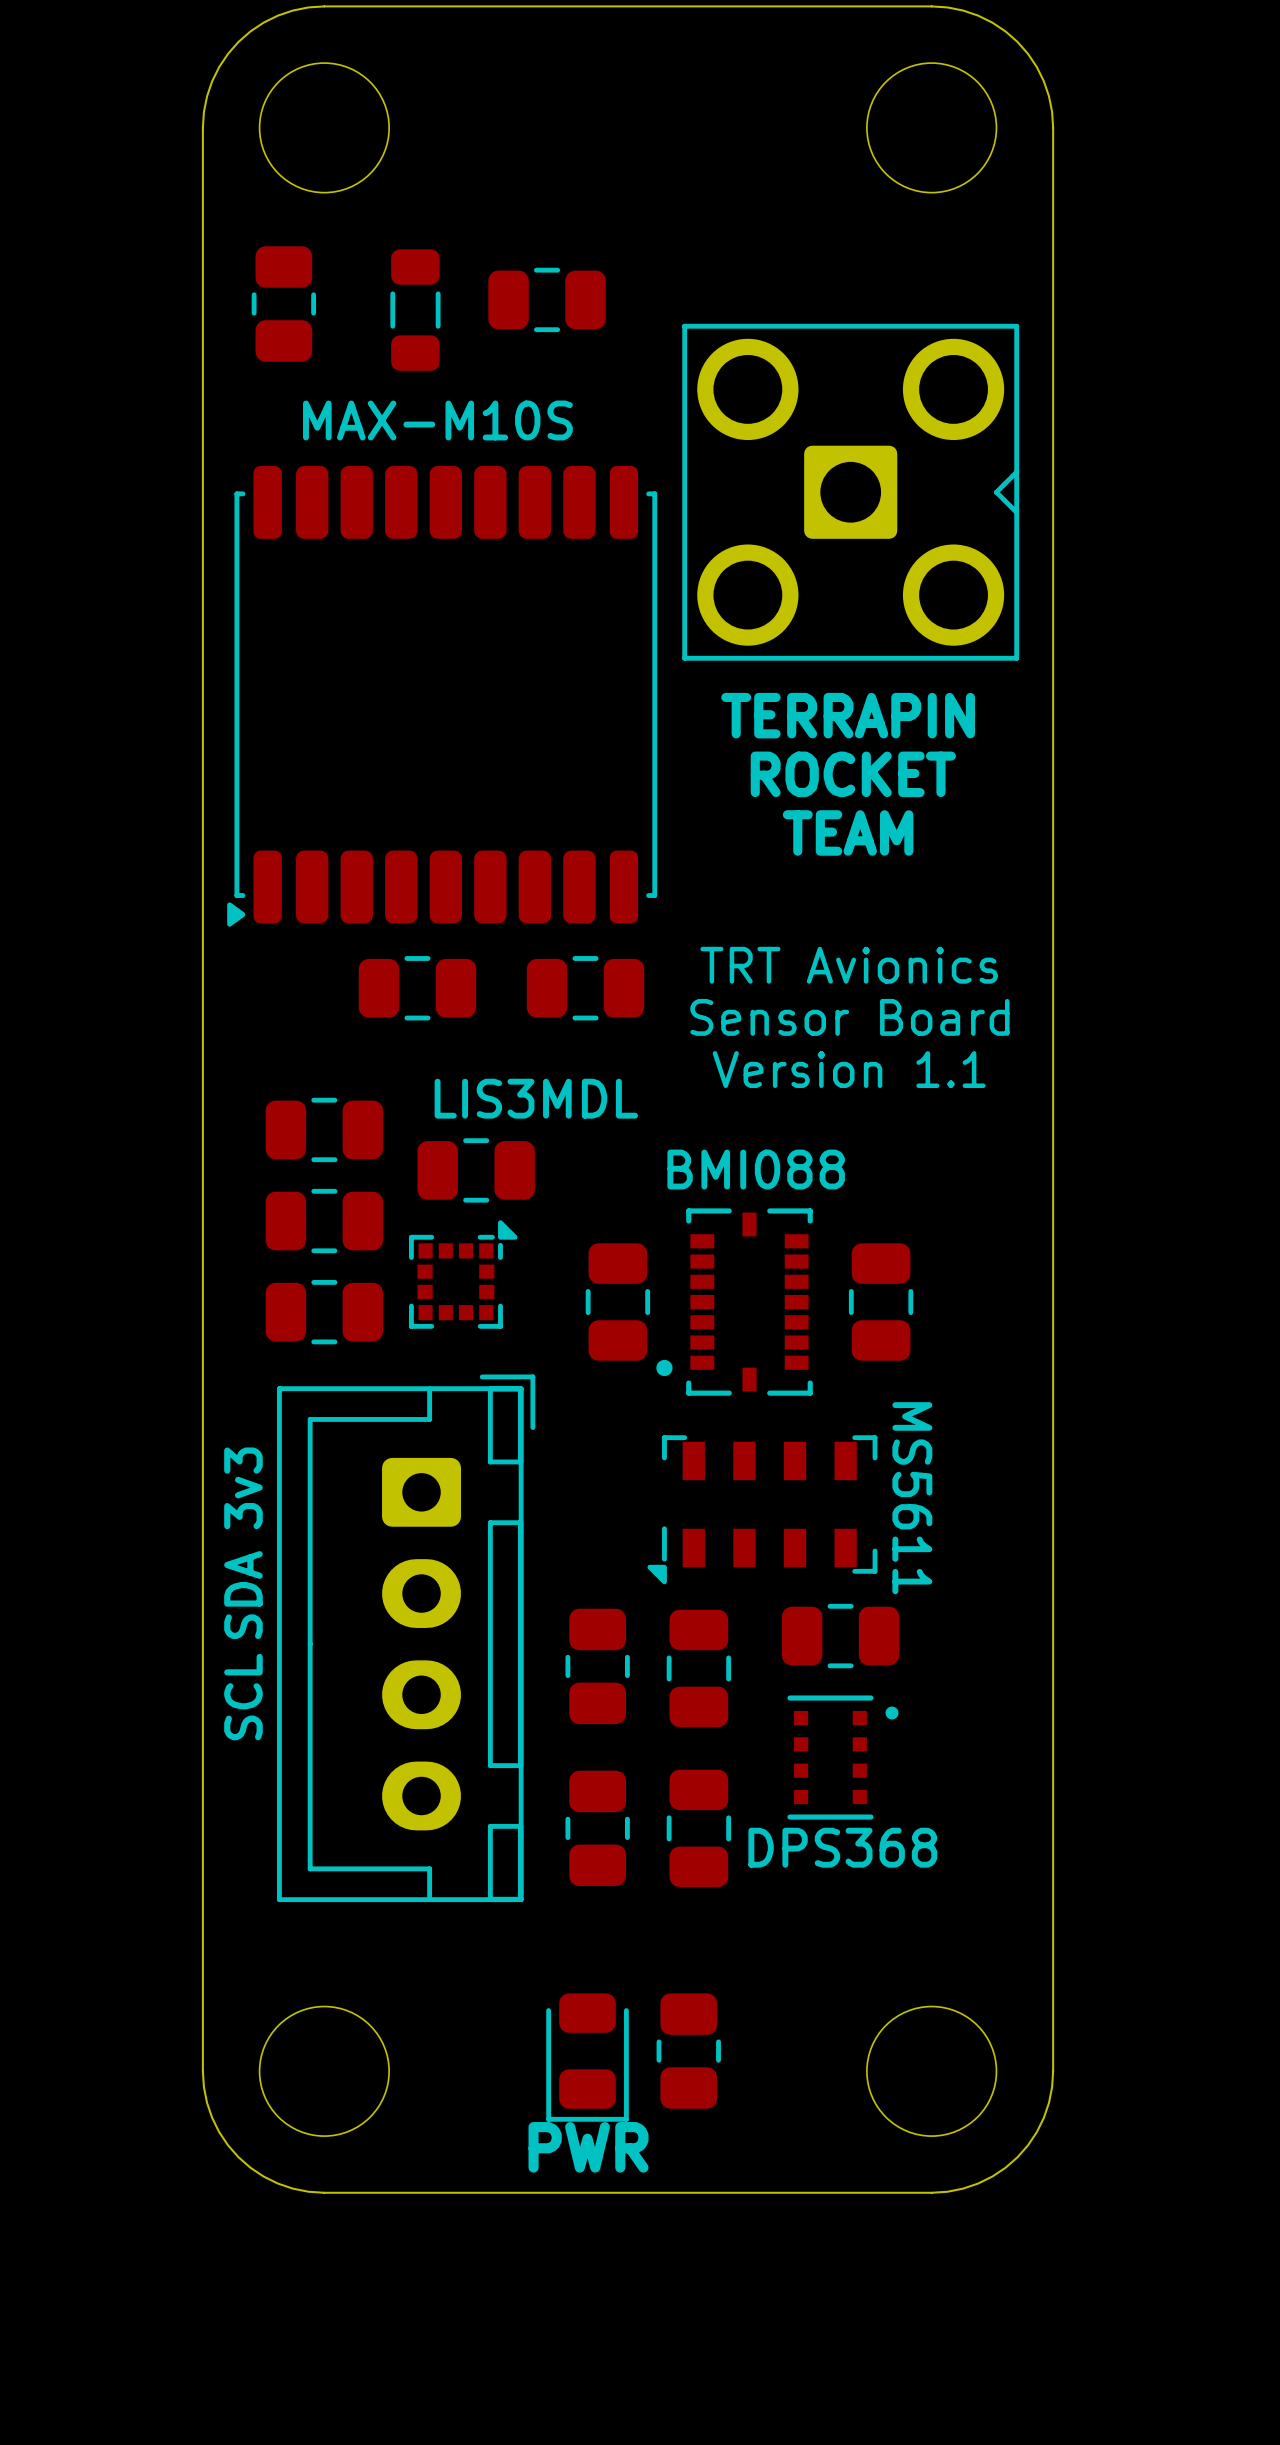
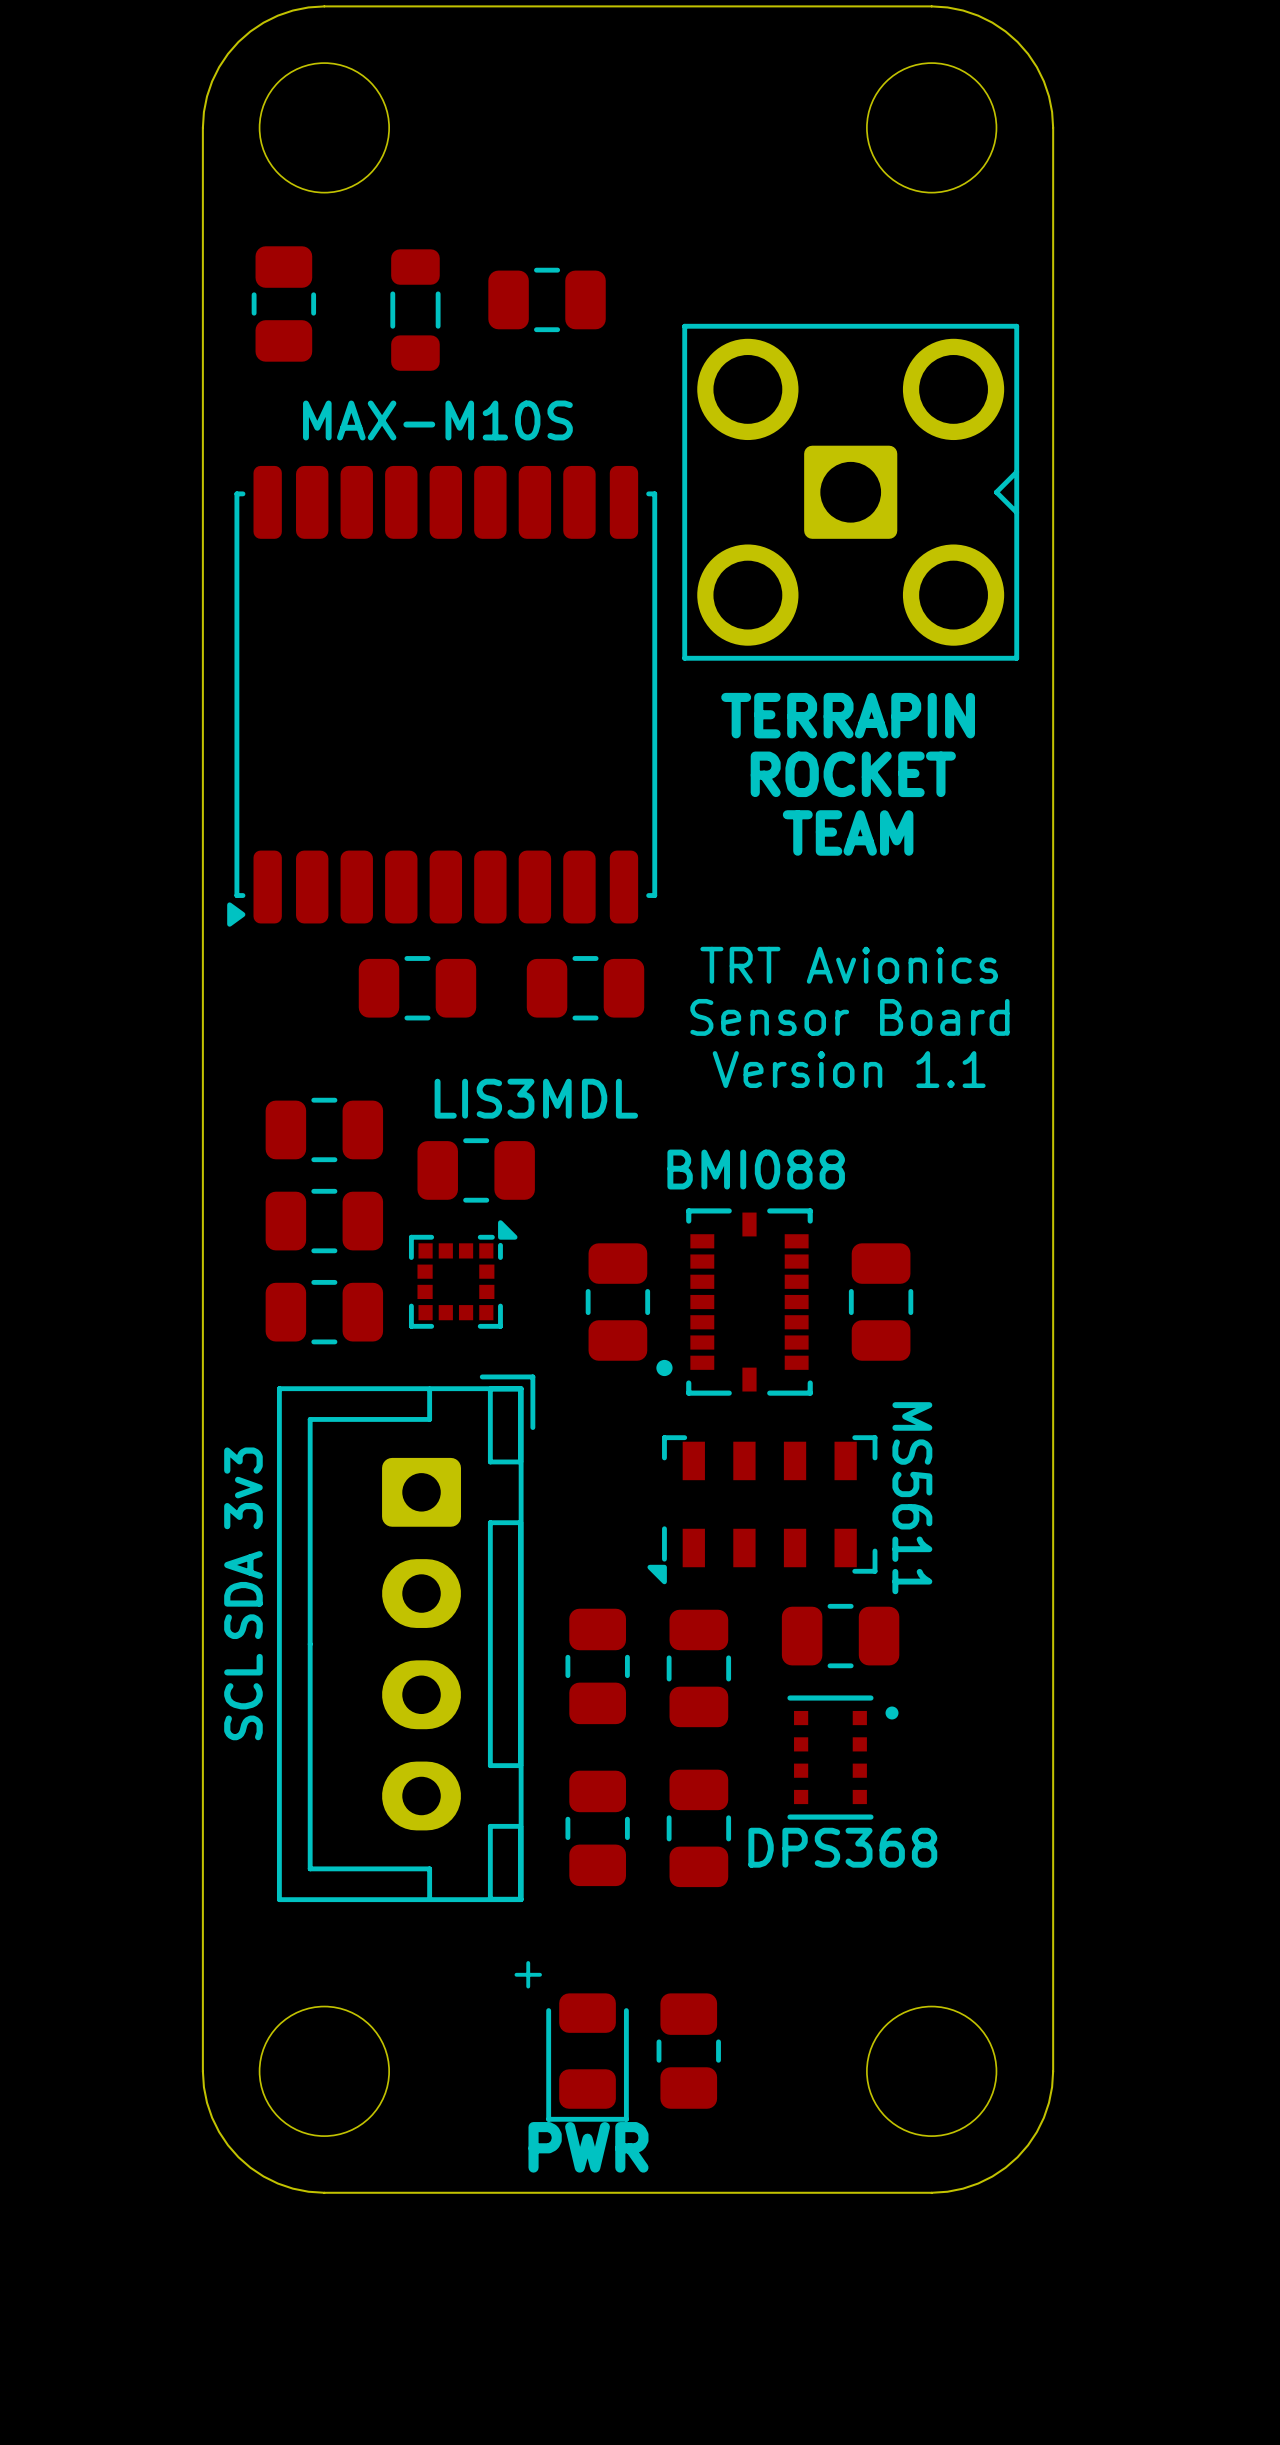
text: none -> + (528, 1974)

